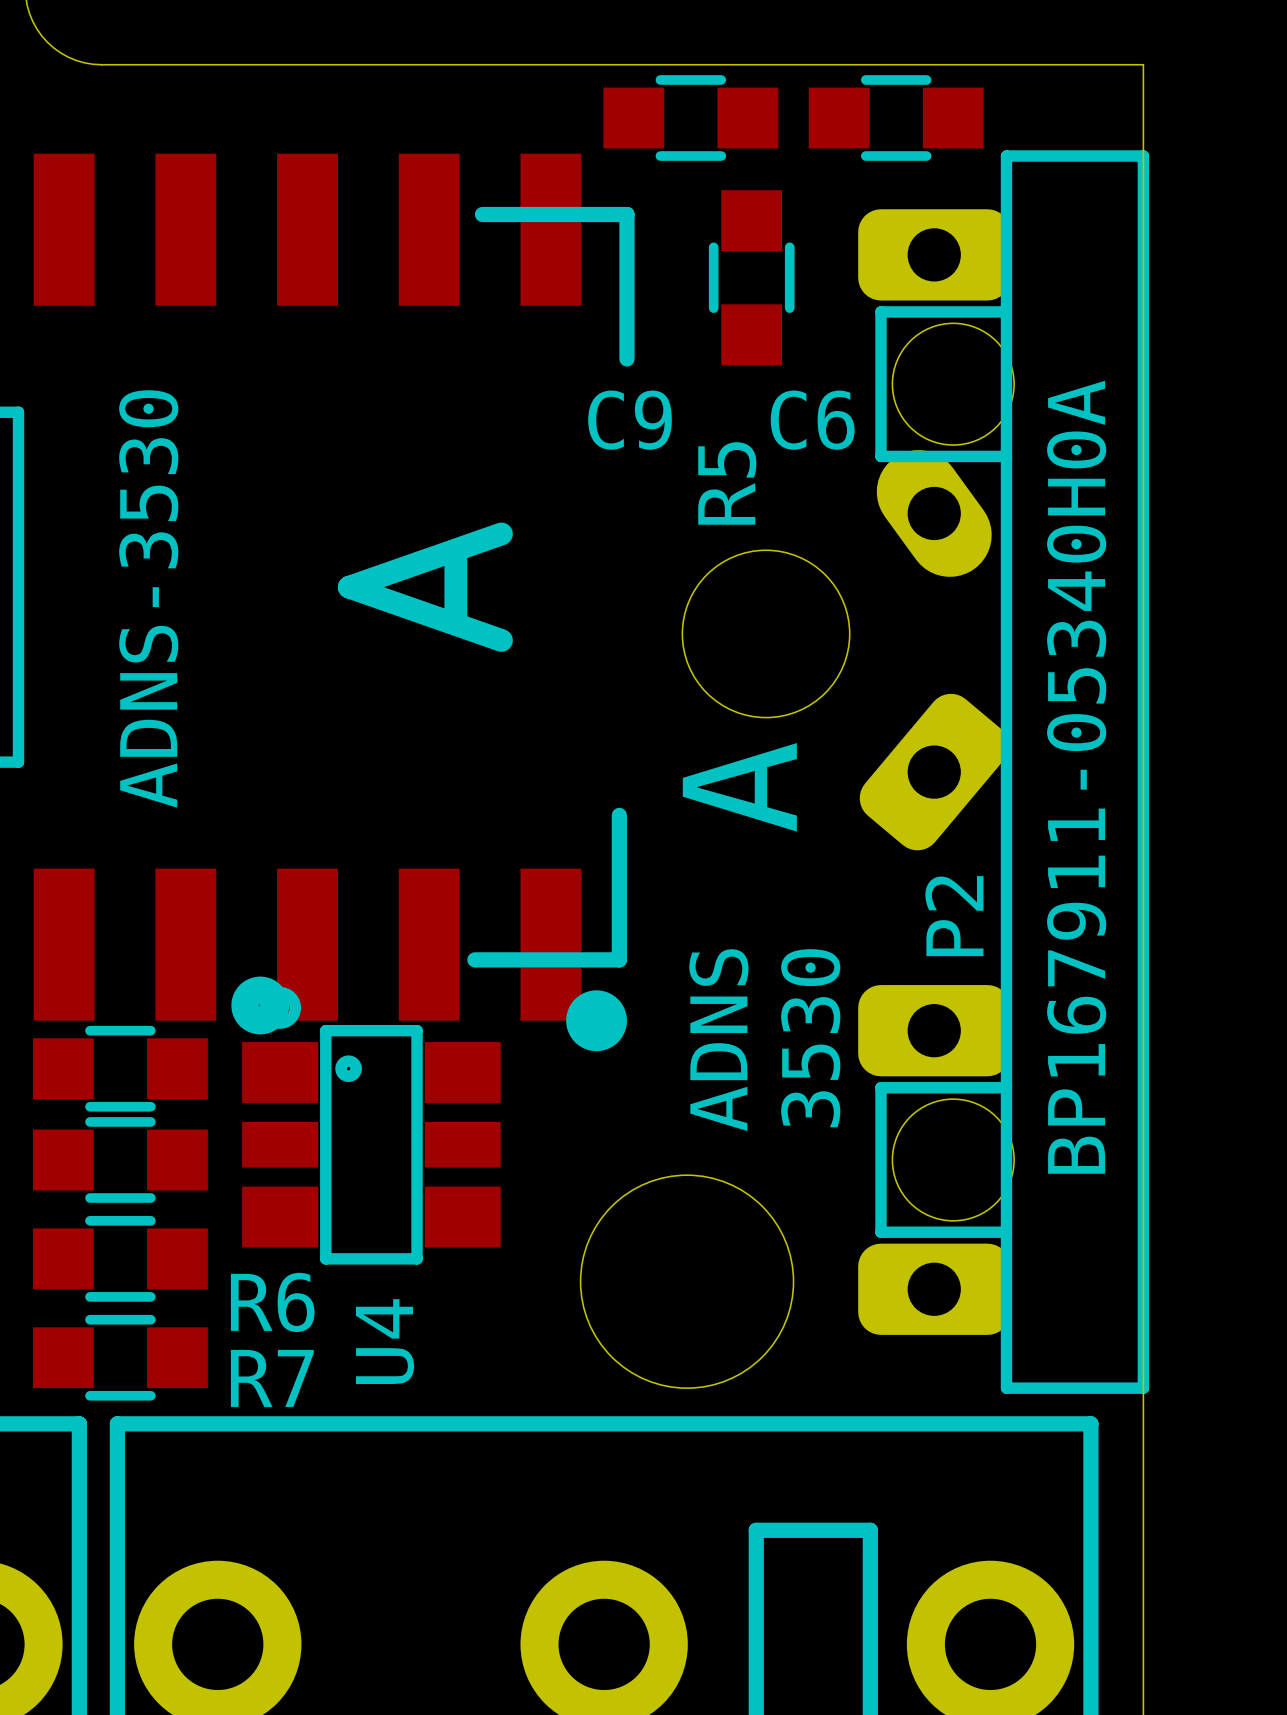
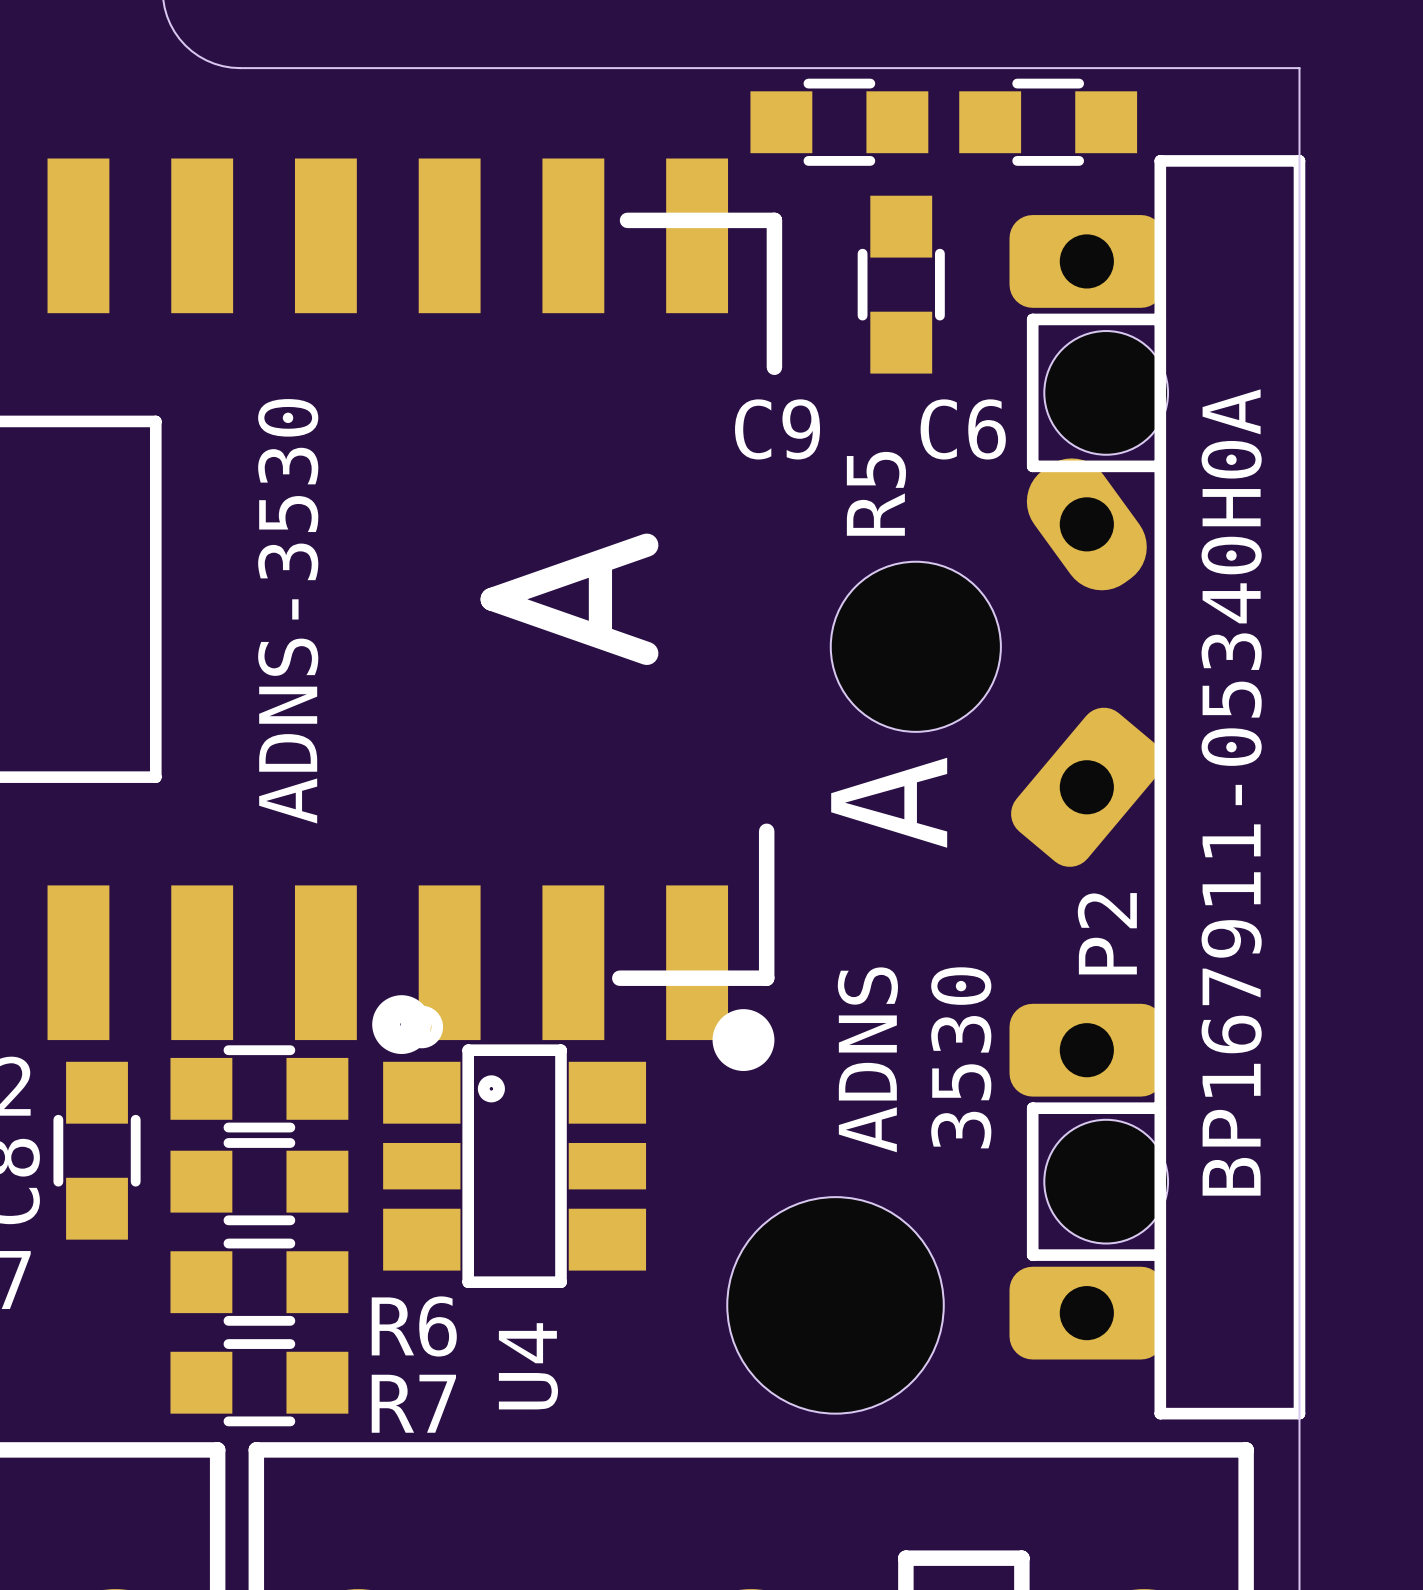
P2 footprint: [858, 150, 1150, 1394] -> [1009, 155, 1306, 1420]

